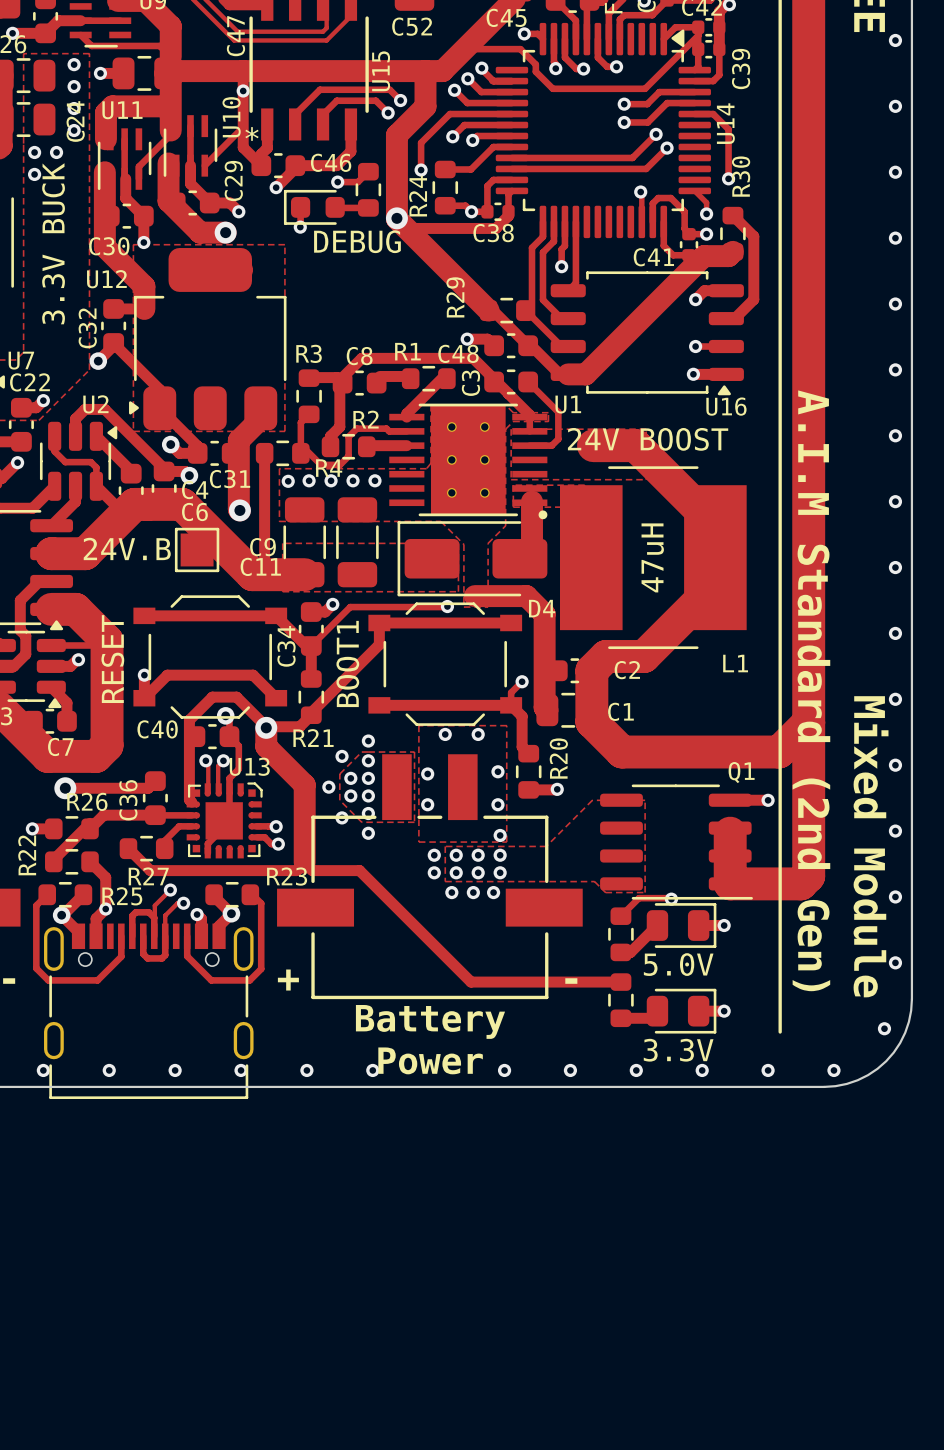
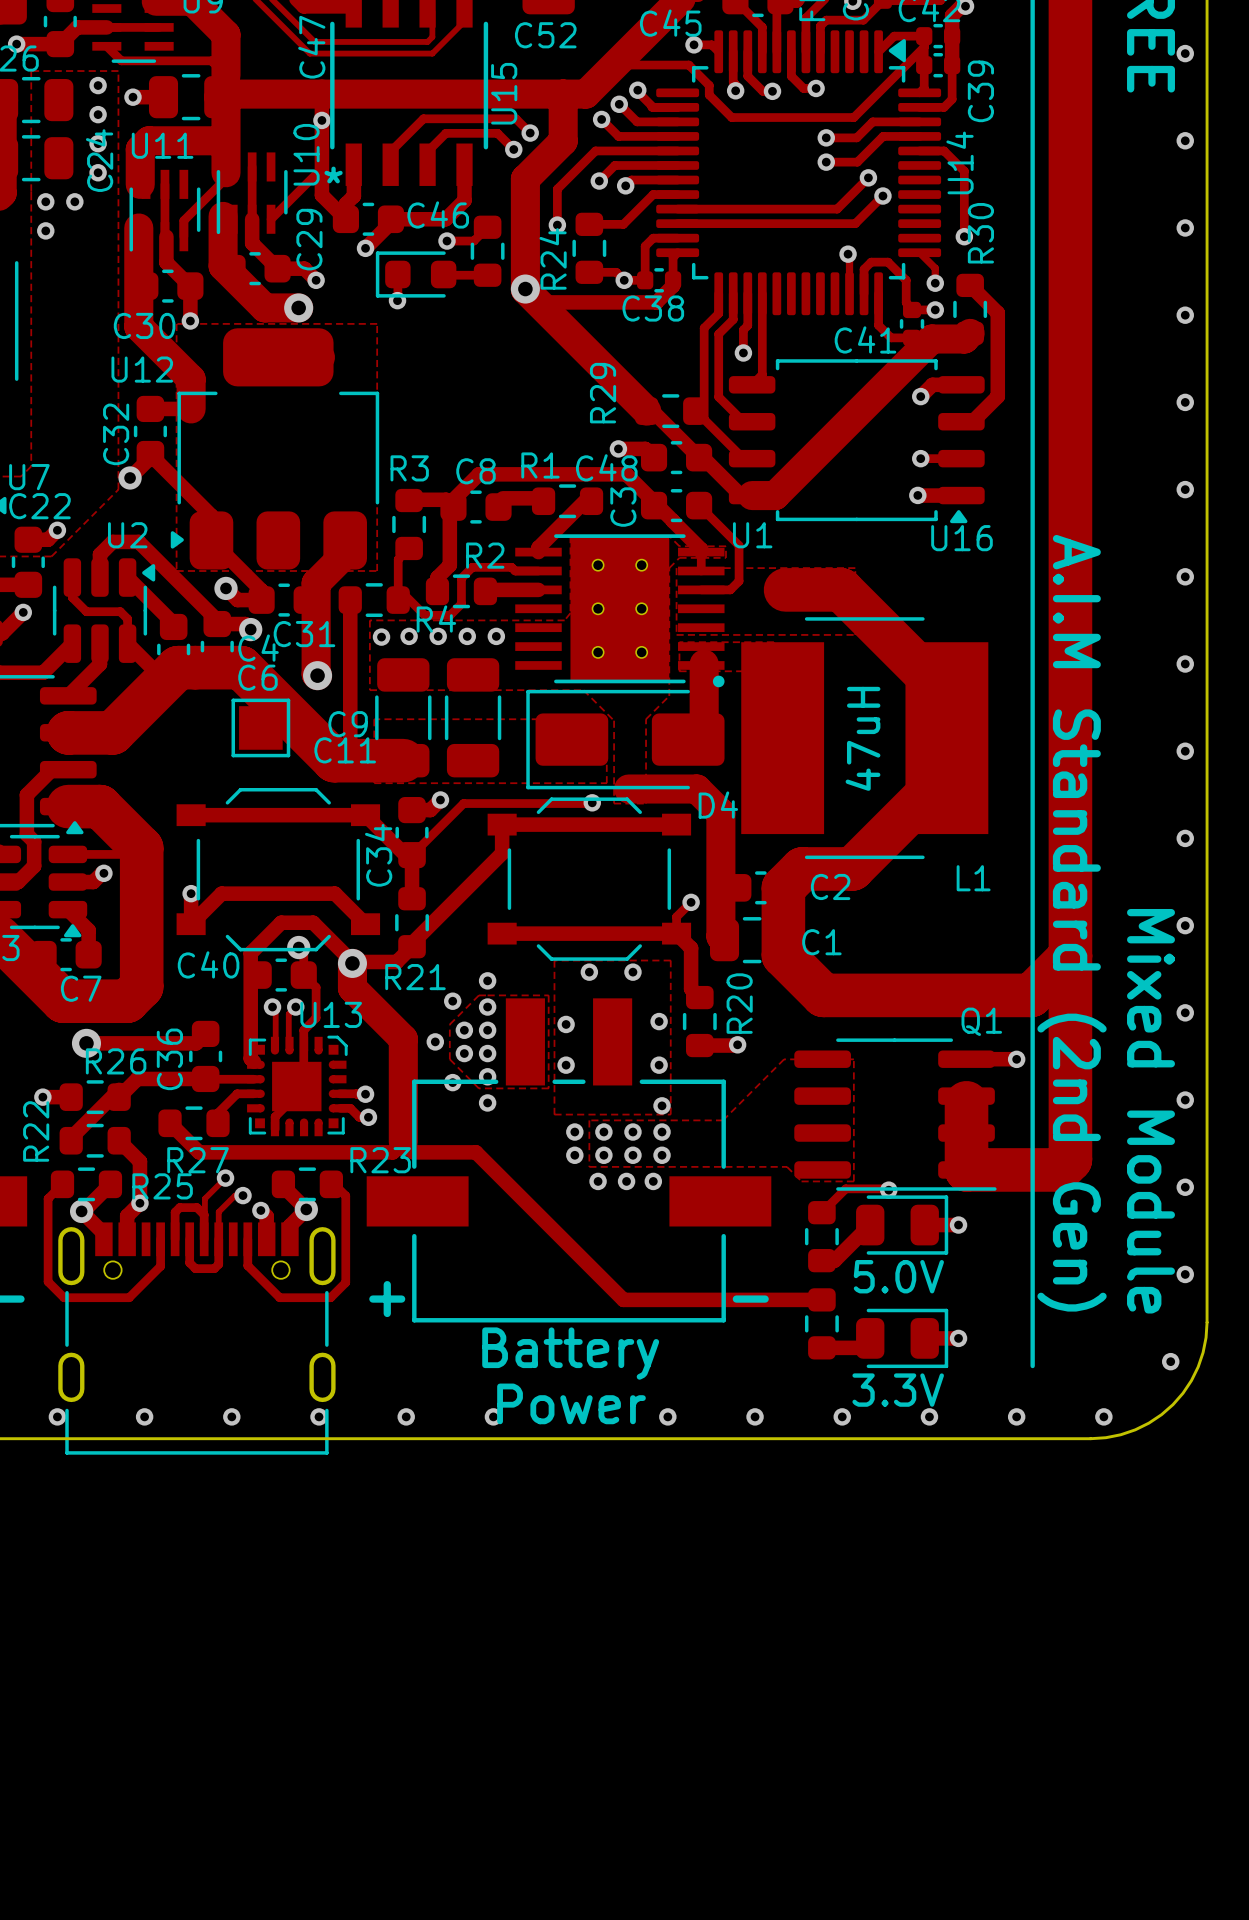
part text: DEBUG (357, 241) -> none
U7 text: 3.3V BUCK (53, 243) -> none
U1 text: 24V BOOST (648, 439) -> none
part text: 24V.B (127, 548) -> none
part text: RESET (112, 659) -> none
part text: BOOT1 (347, 663) -> none

